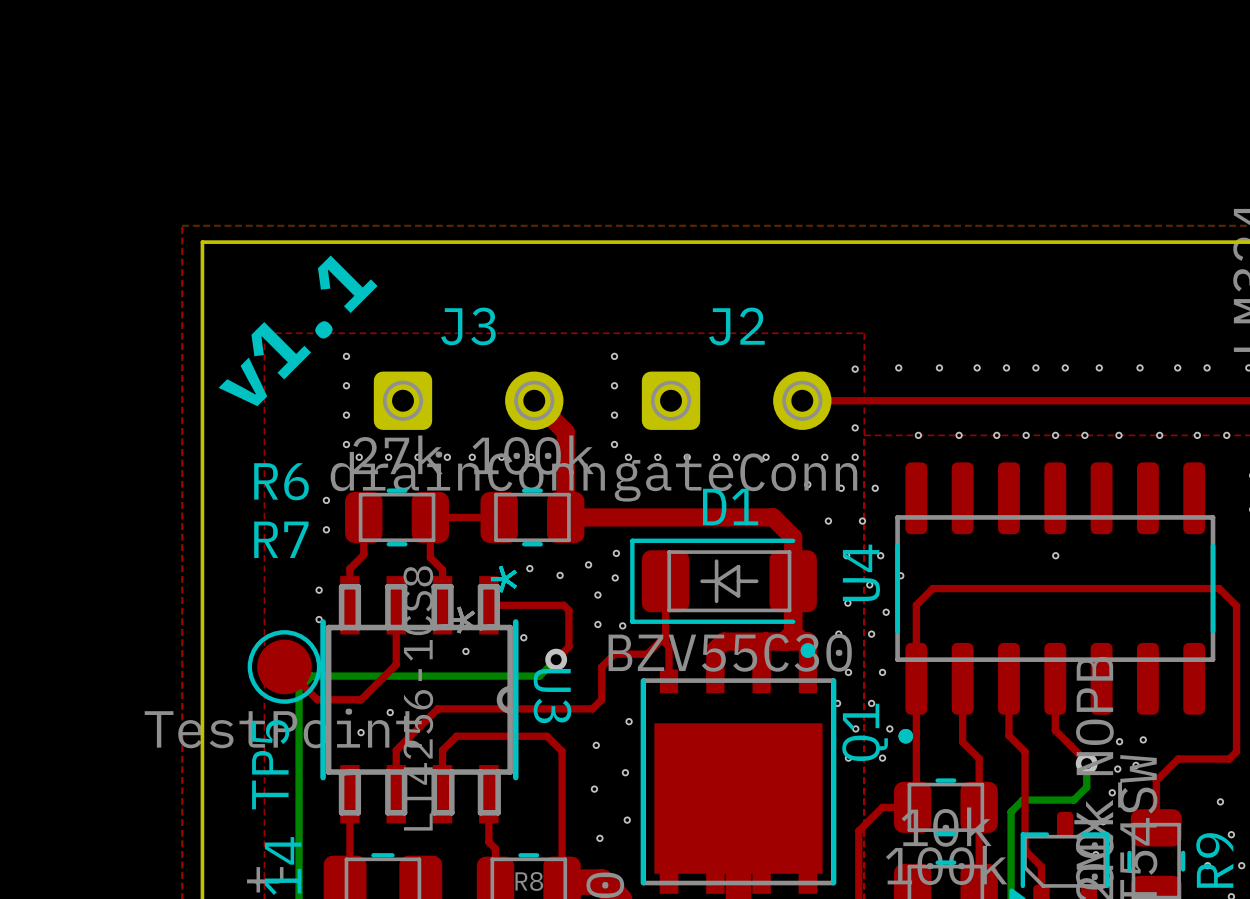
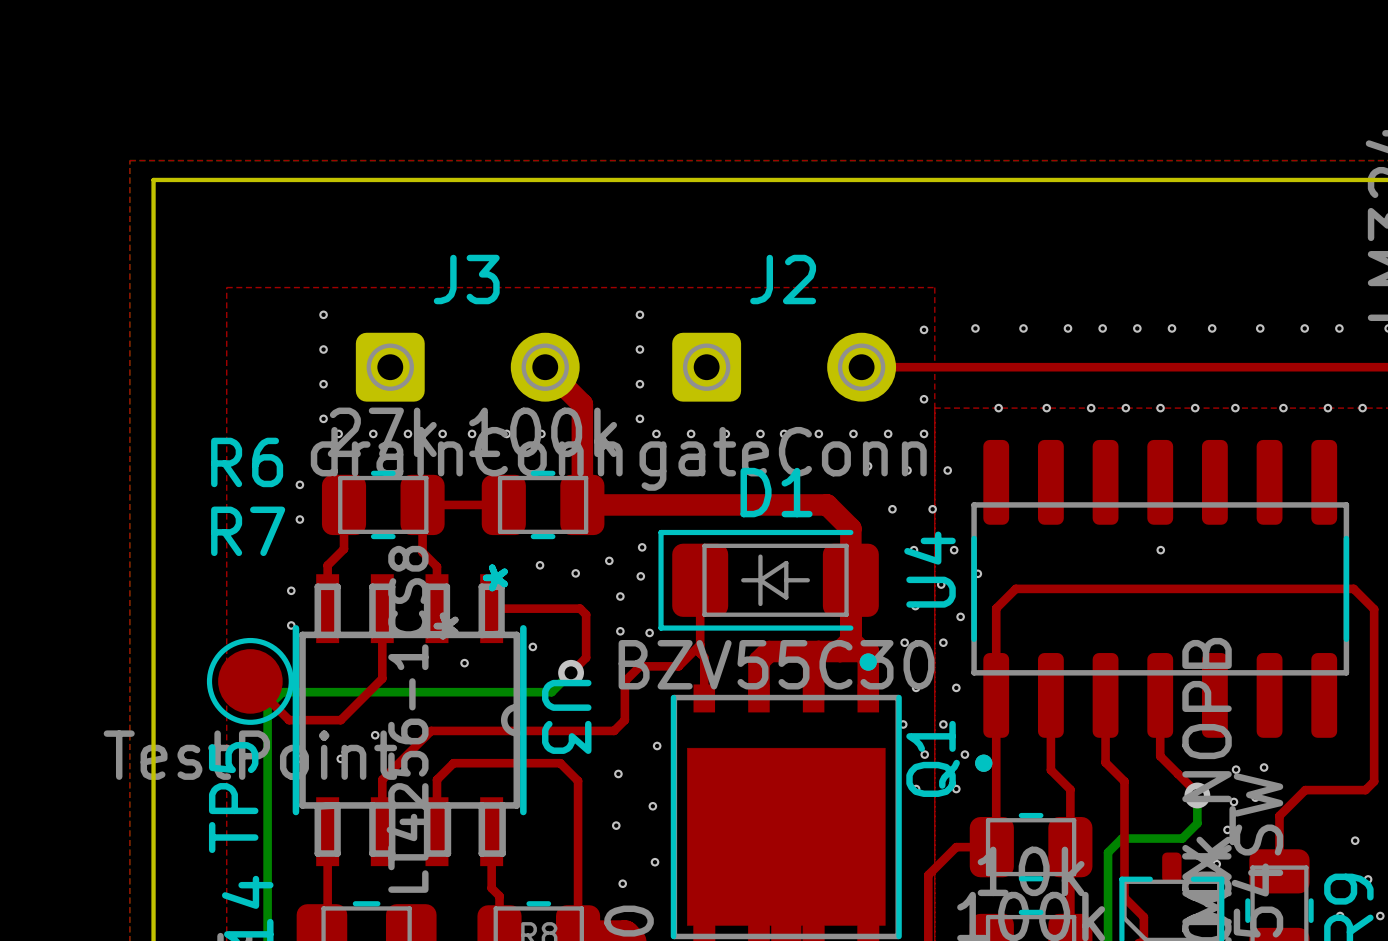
text: v1.1 (298, 330) -> none

